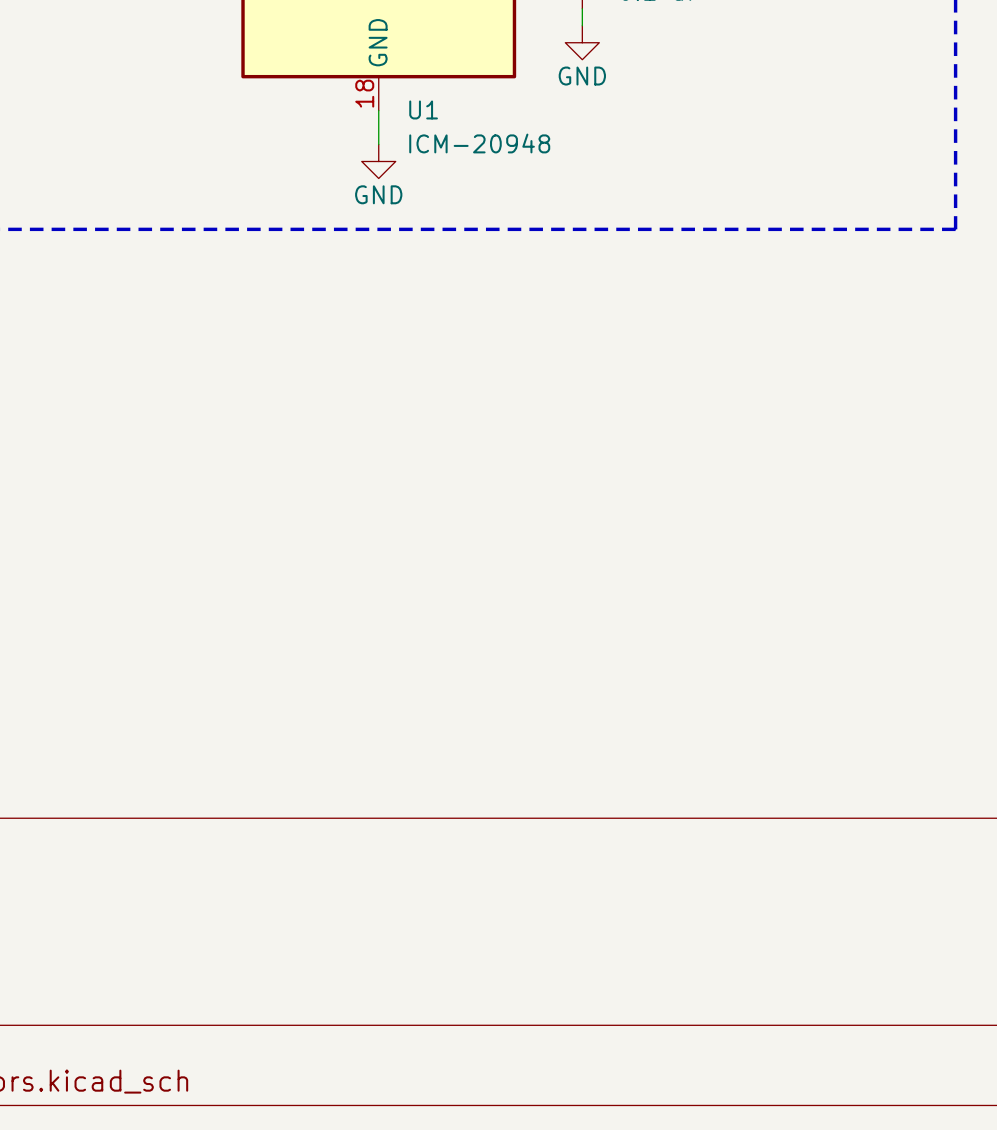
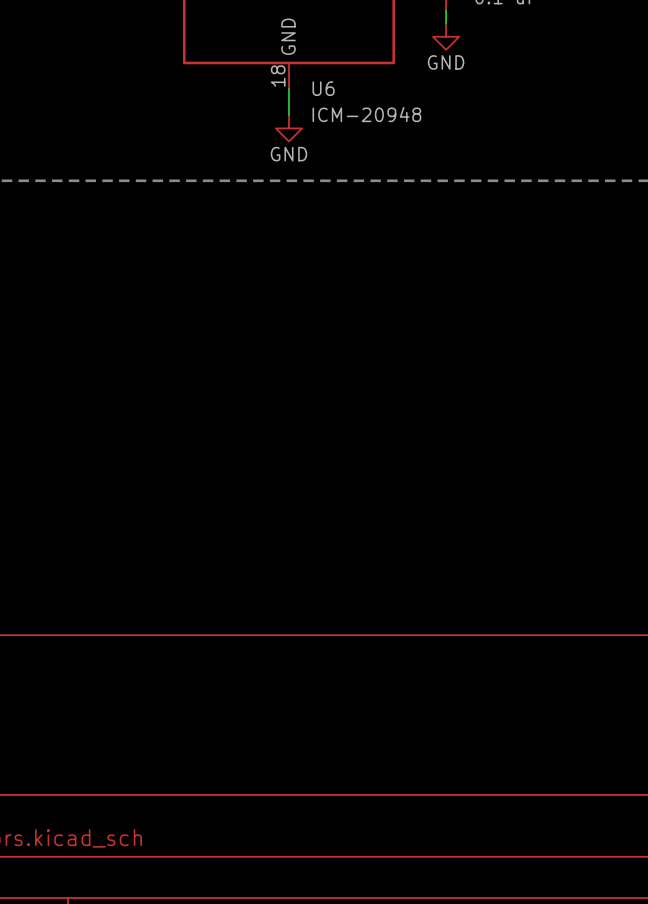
U1 name: U1 (423, 109) -> U6 (323, 88)

